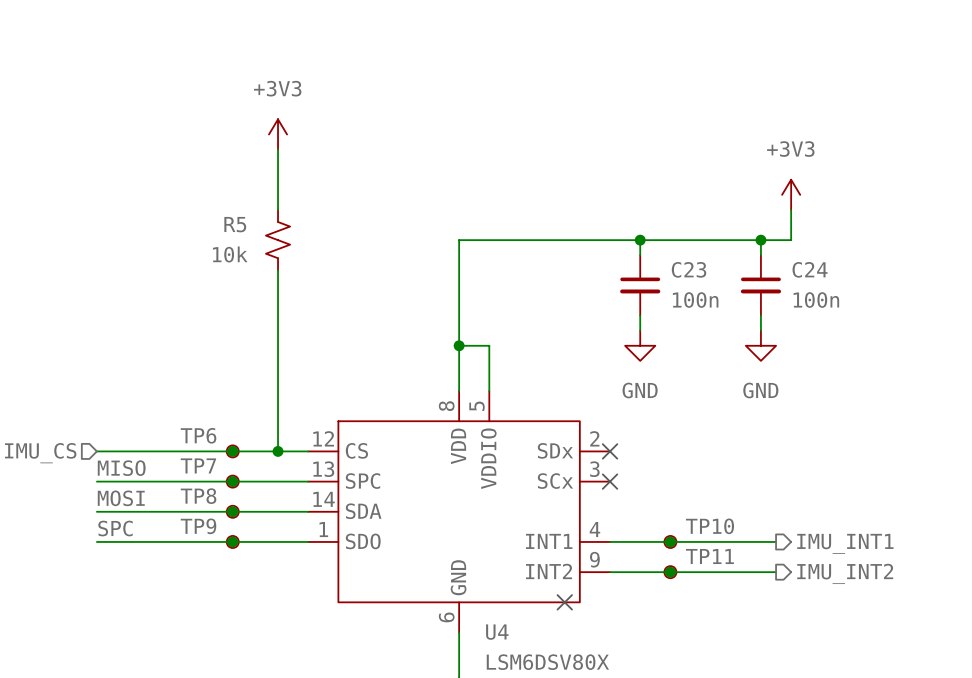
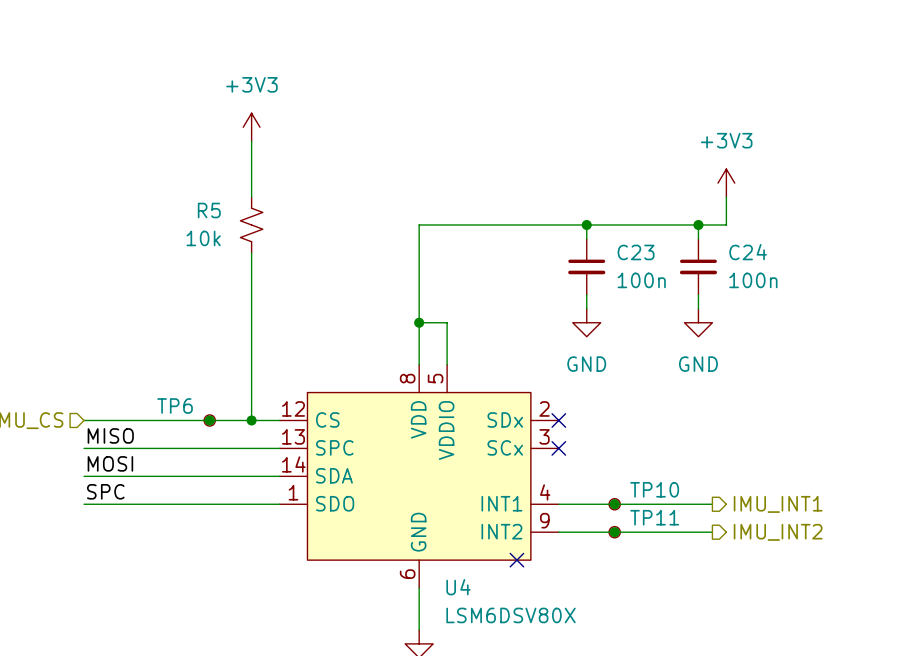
junction: (232, 481) -> none
TP7: (232, 481) -> none
junction: (232, 511) -> none
TP8: (232, 511) -> none
junction: (232, 541) -> none
TP9: (232, 541) -> none

